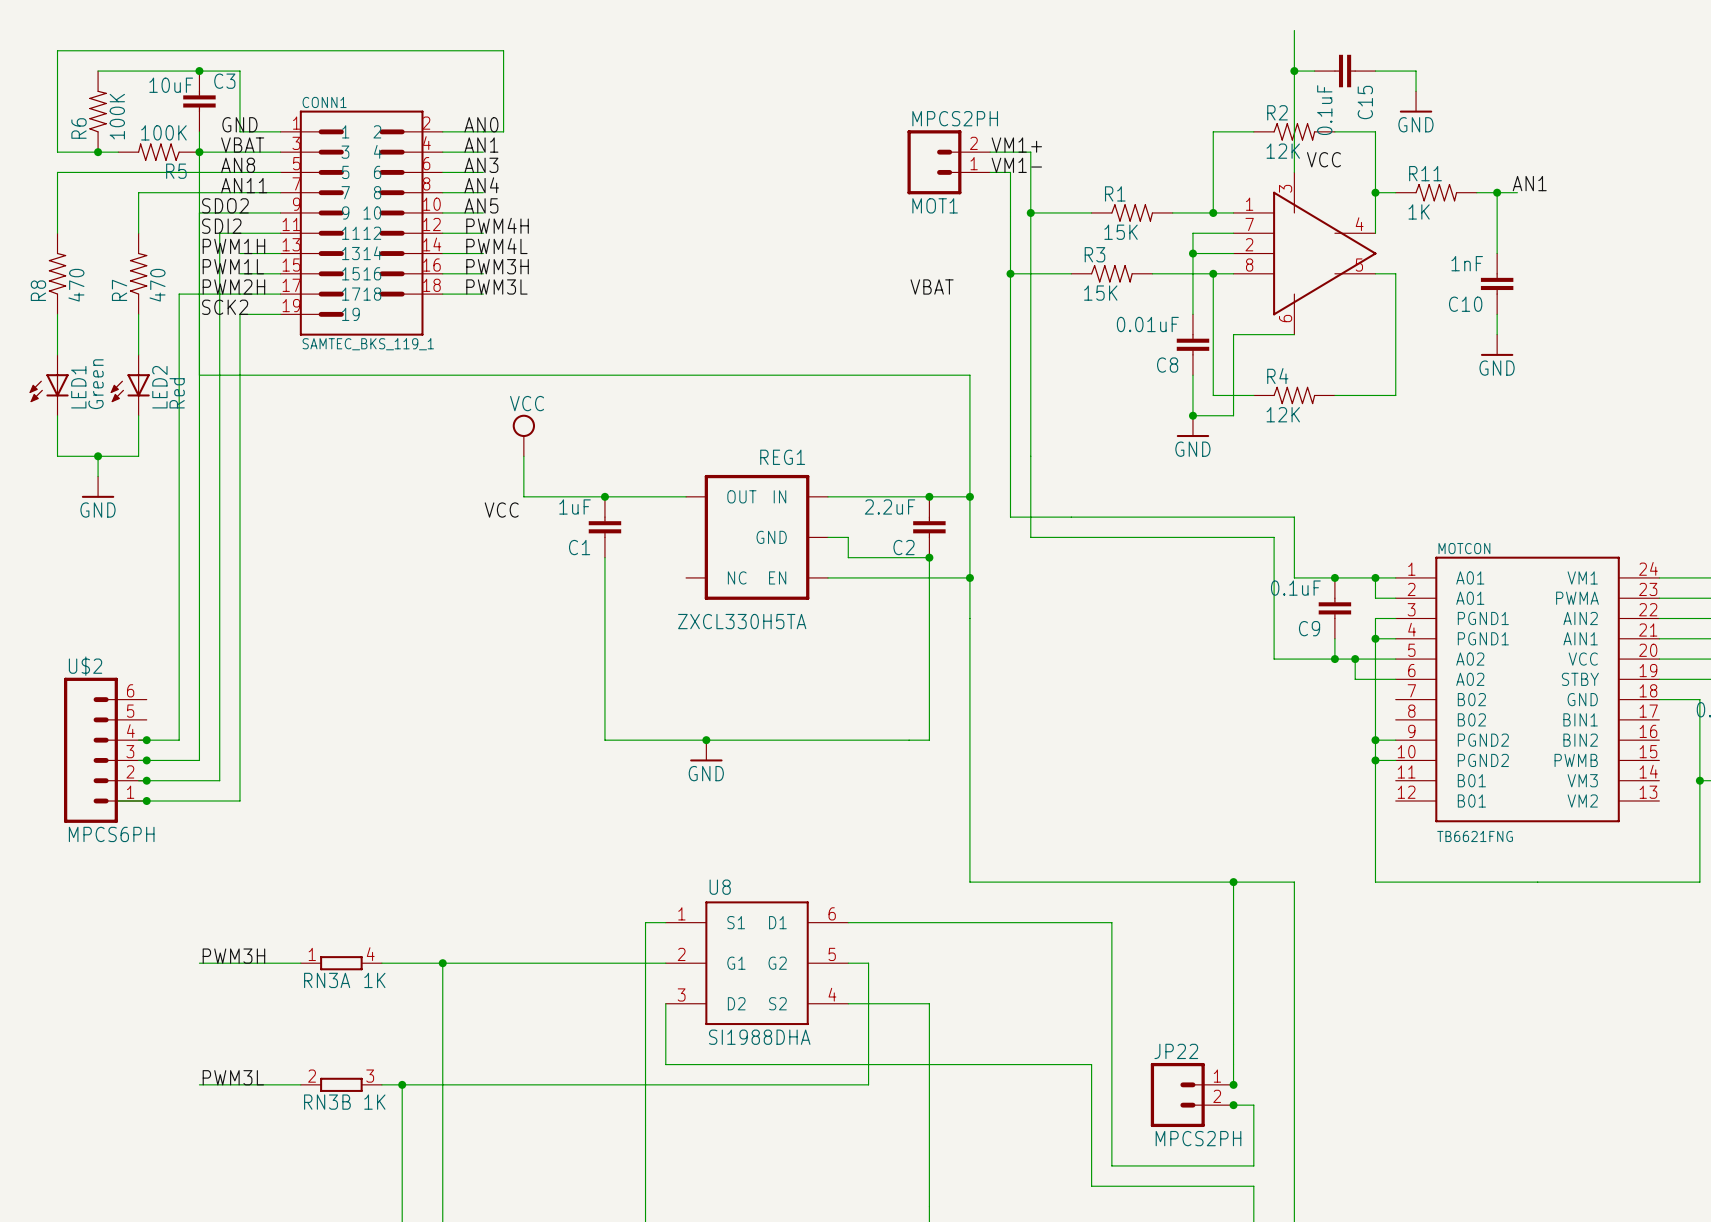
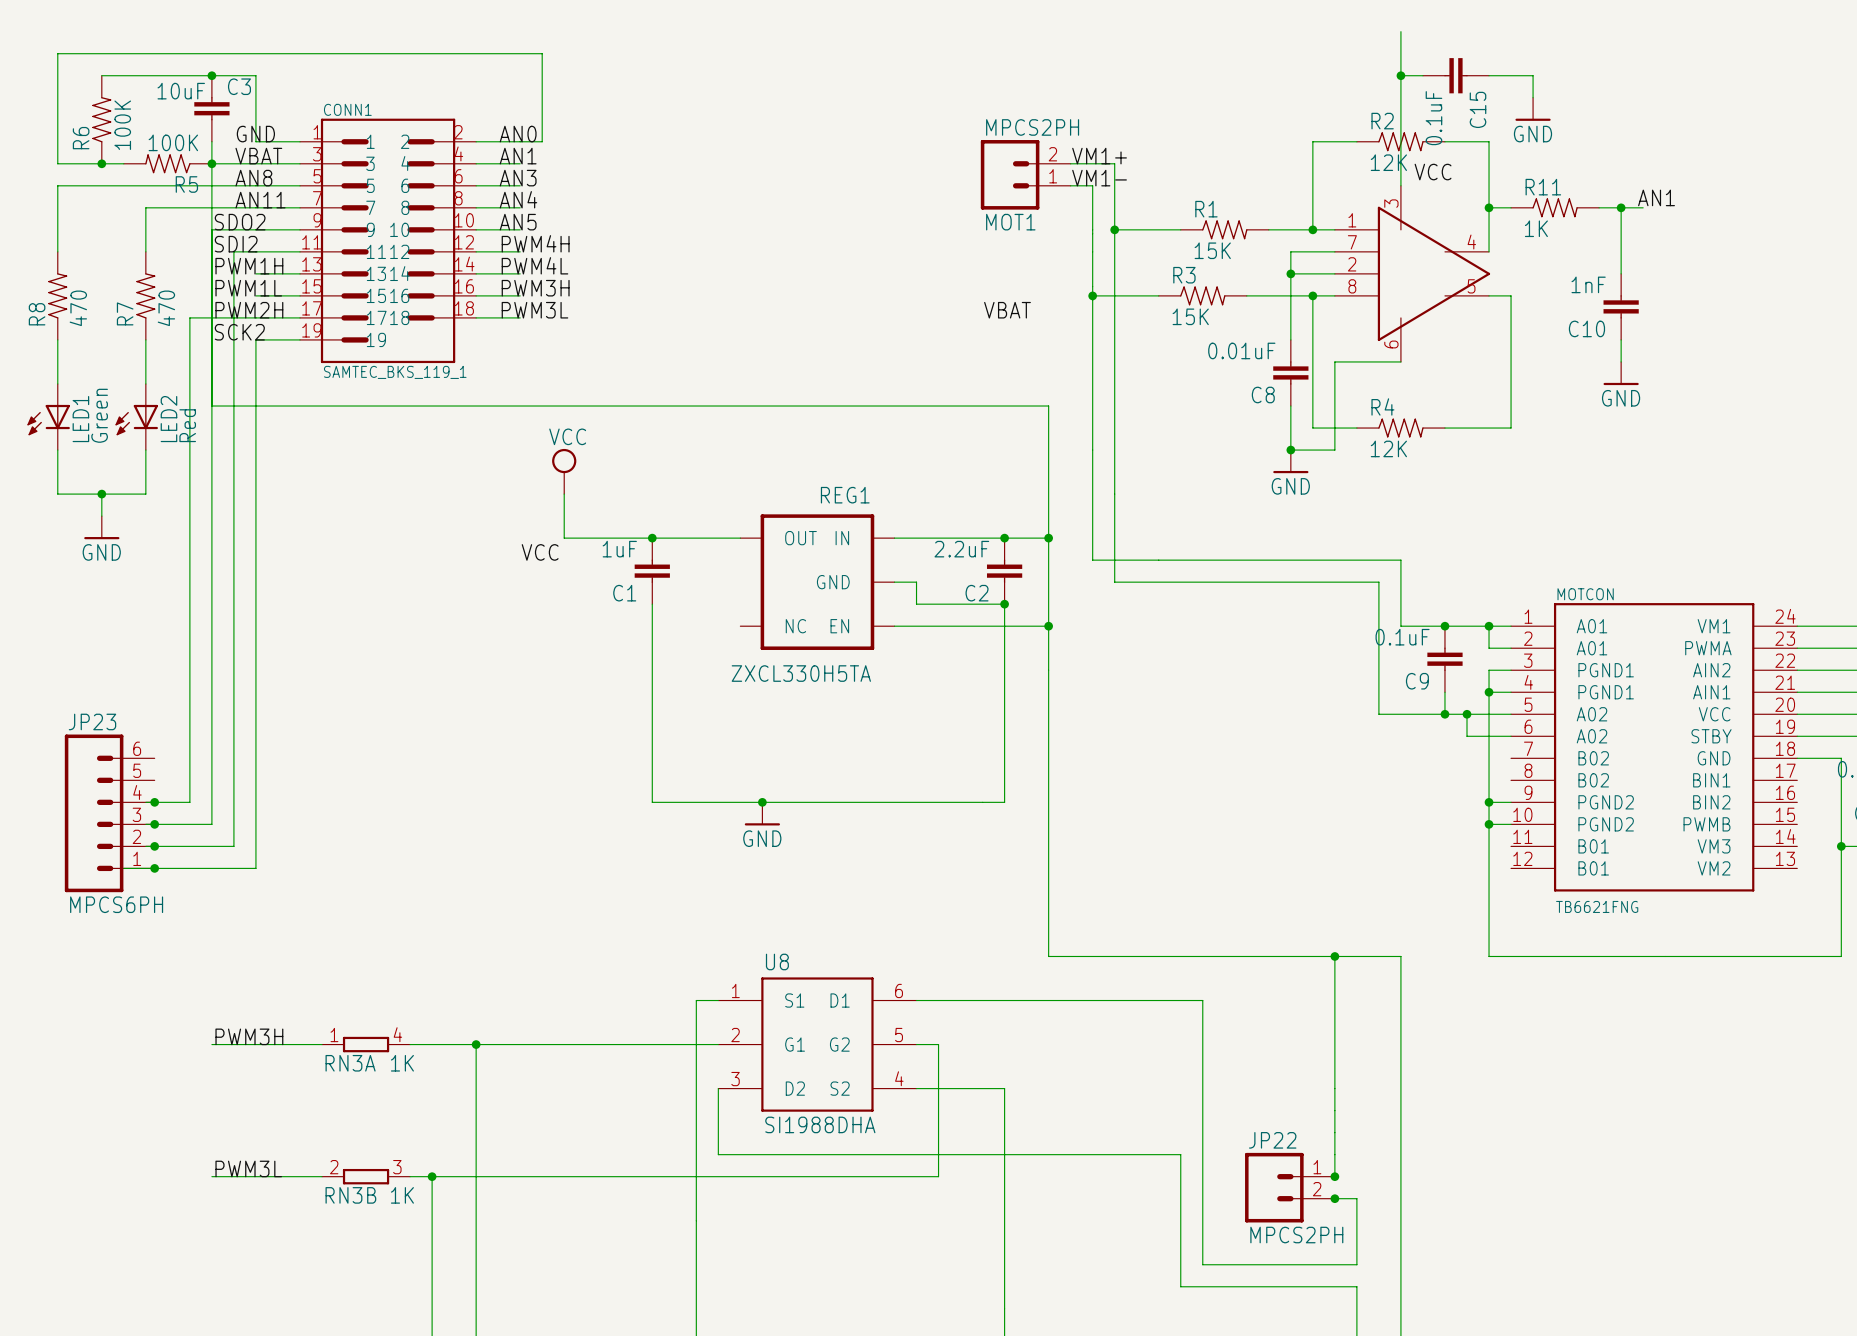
U$2 name: U$2 (85, 666) -> JP23 (92, 721)

